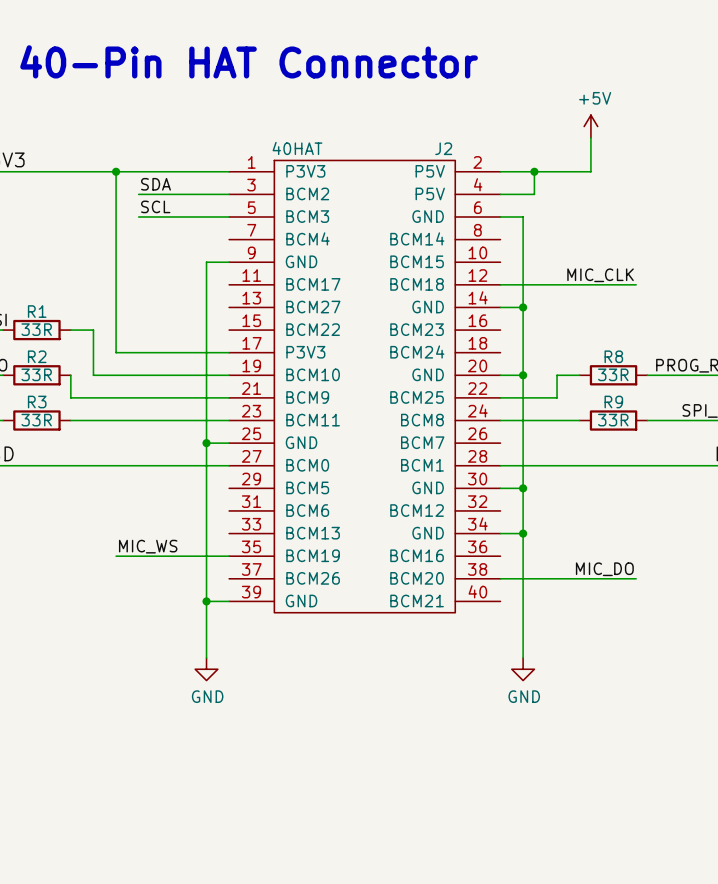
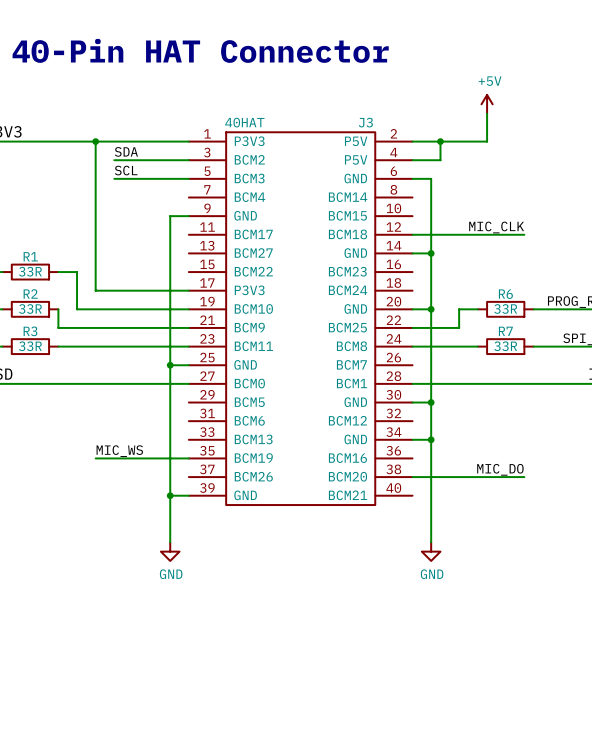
J2 name: J2 (443, 148) -> J3 (365, 122)
R8 name: R8 (613, 356) -> R6 (505, 294)
R9 name: R9 (613, 402) -> R7 (505, 331)

